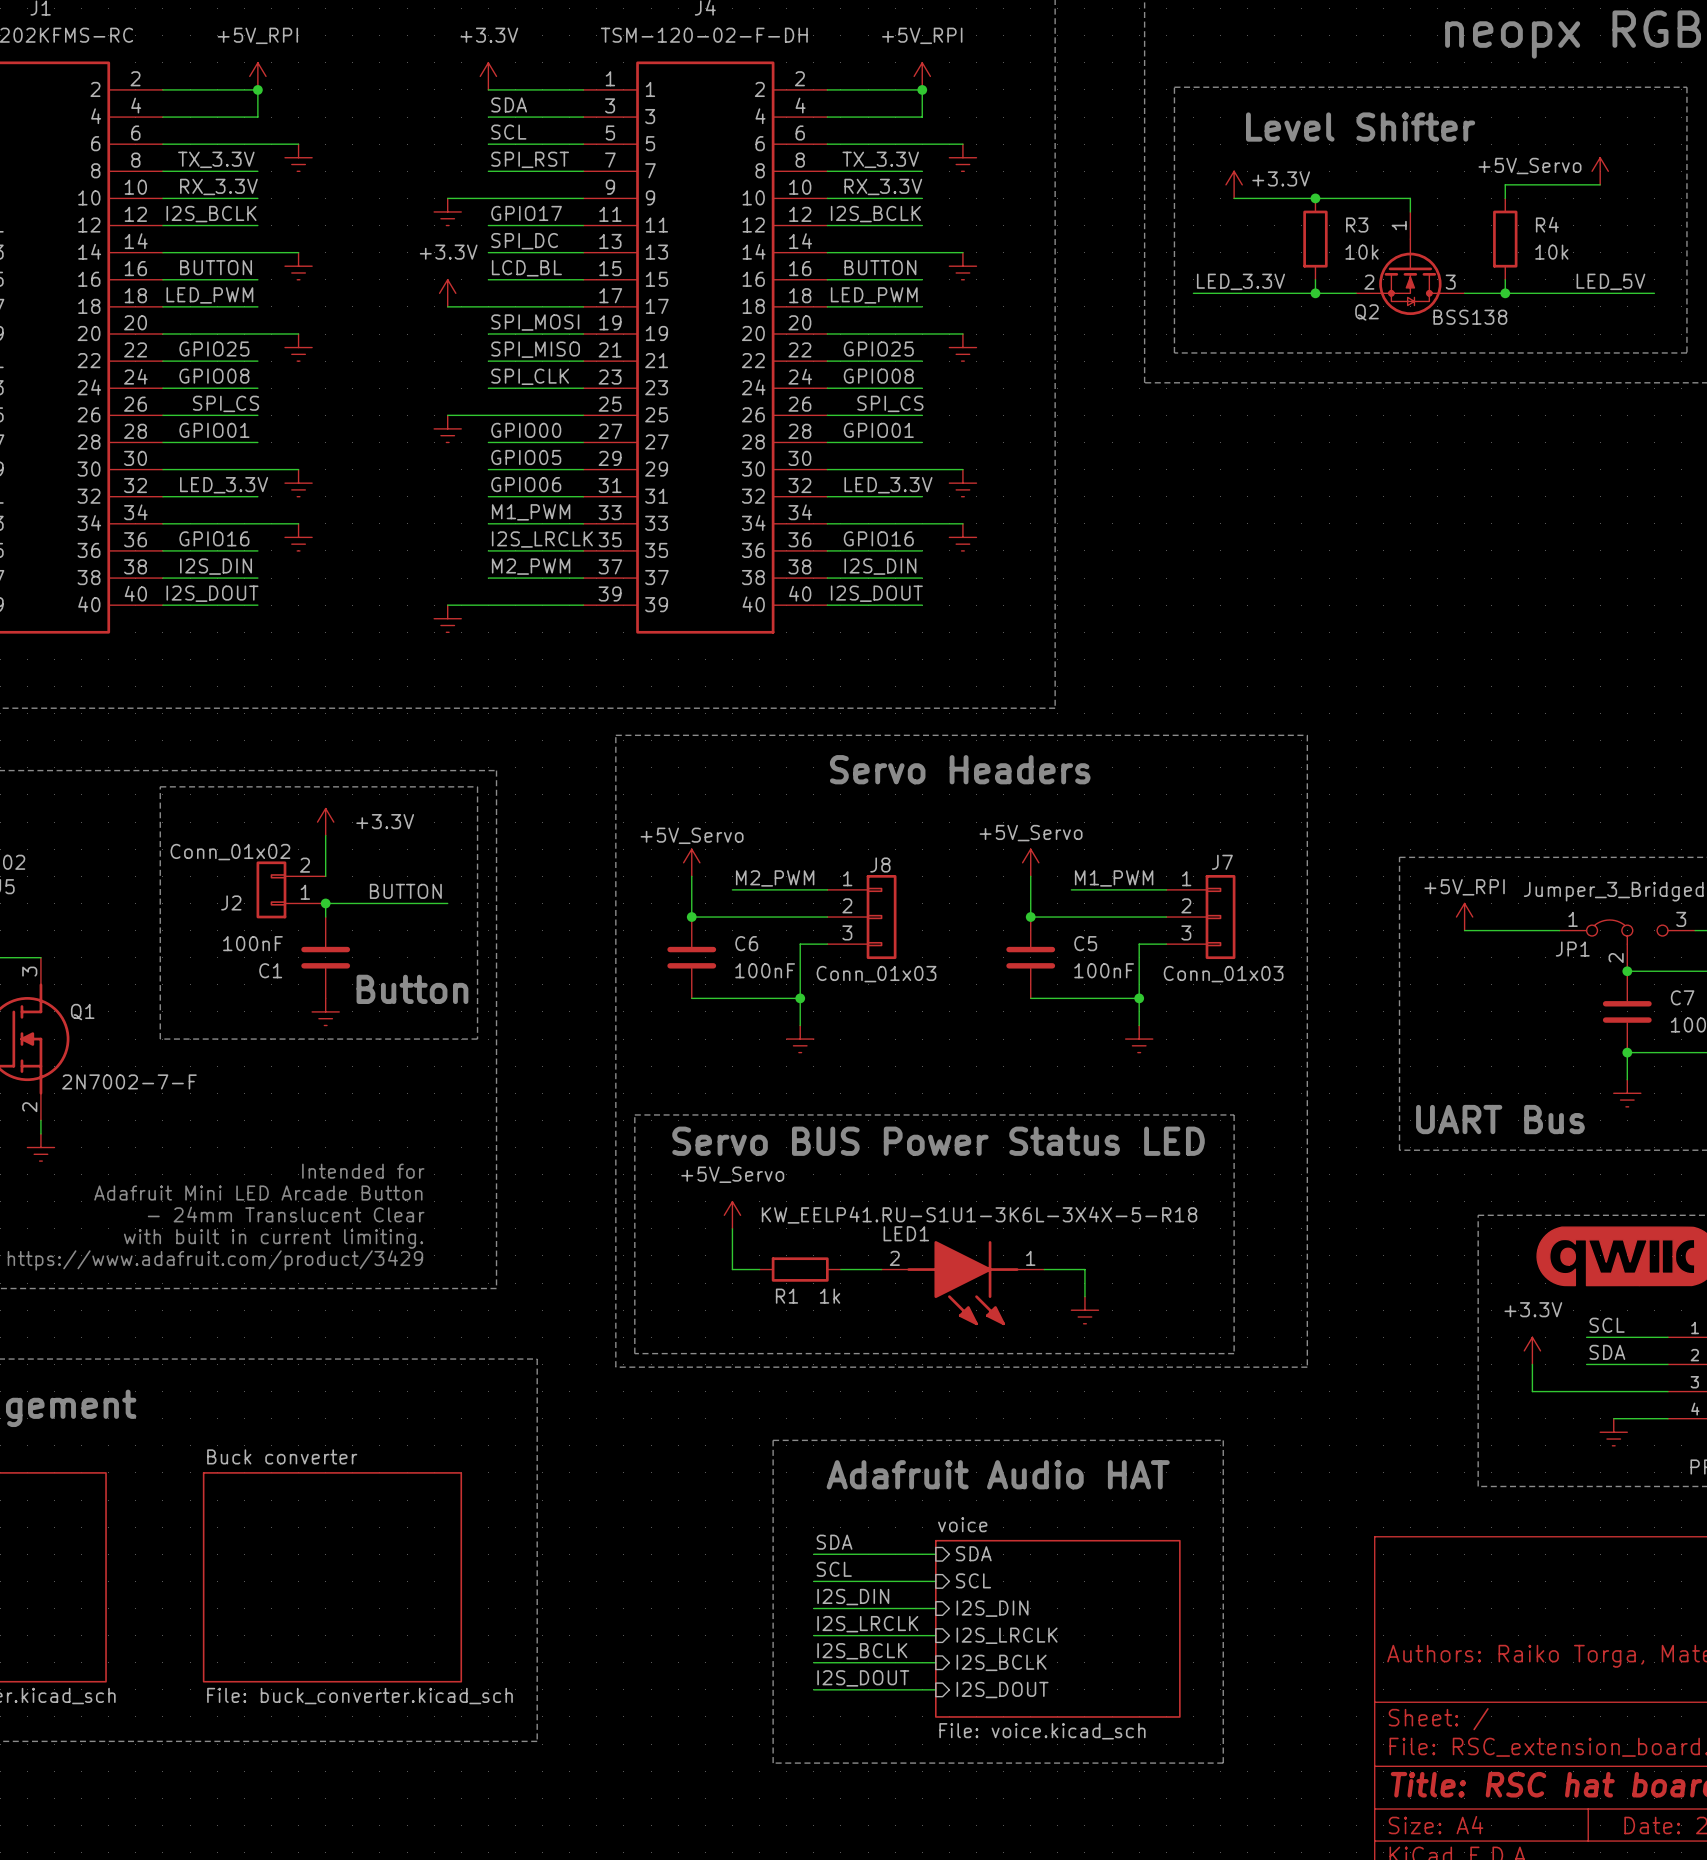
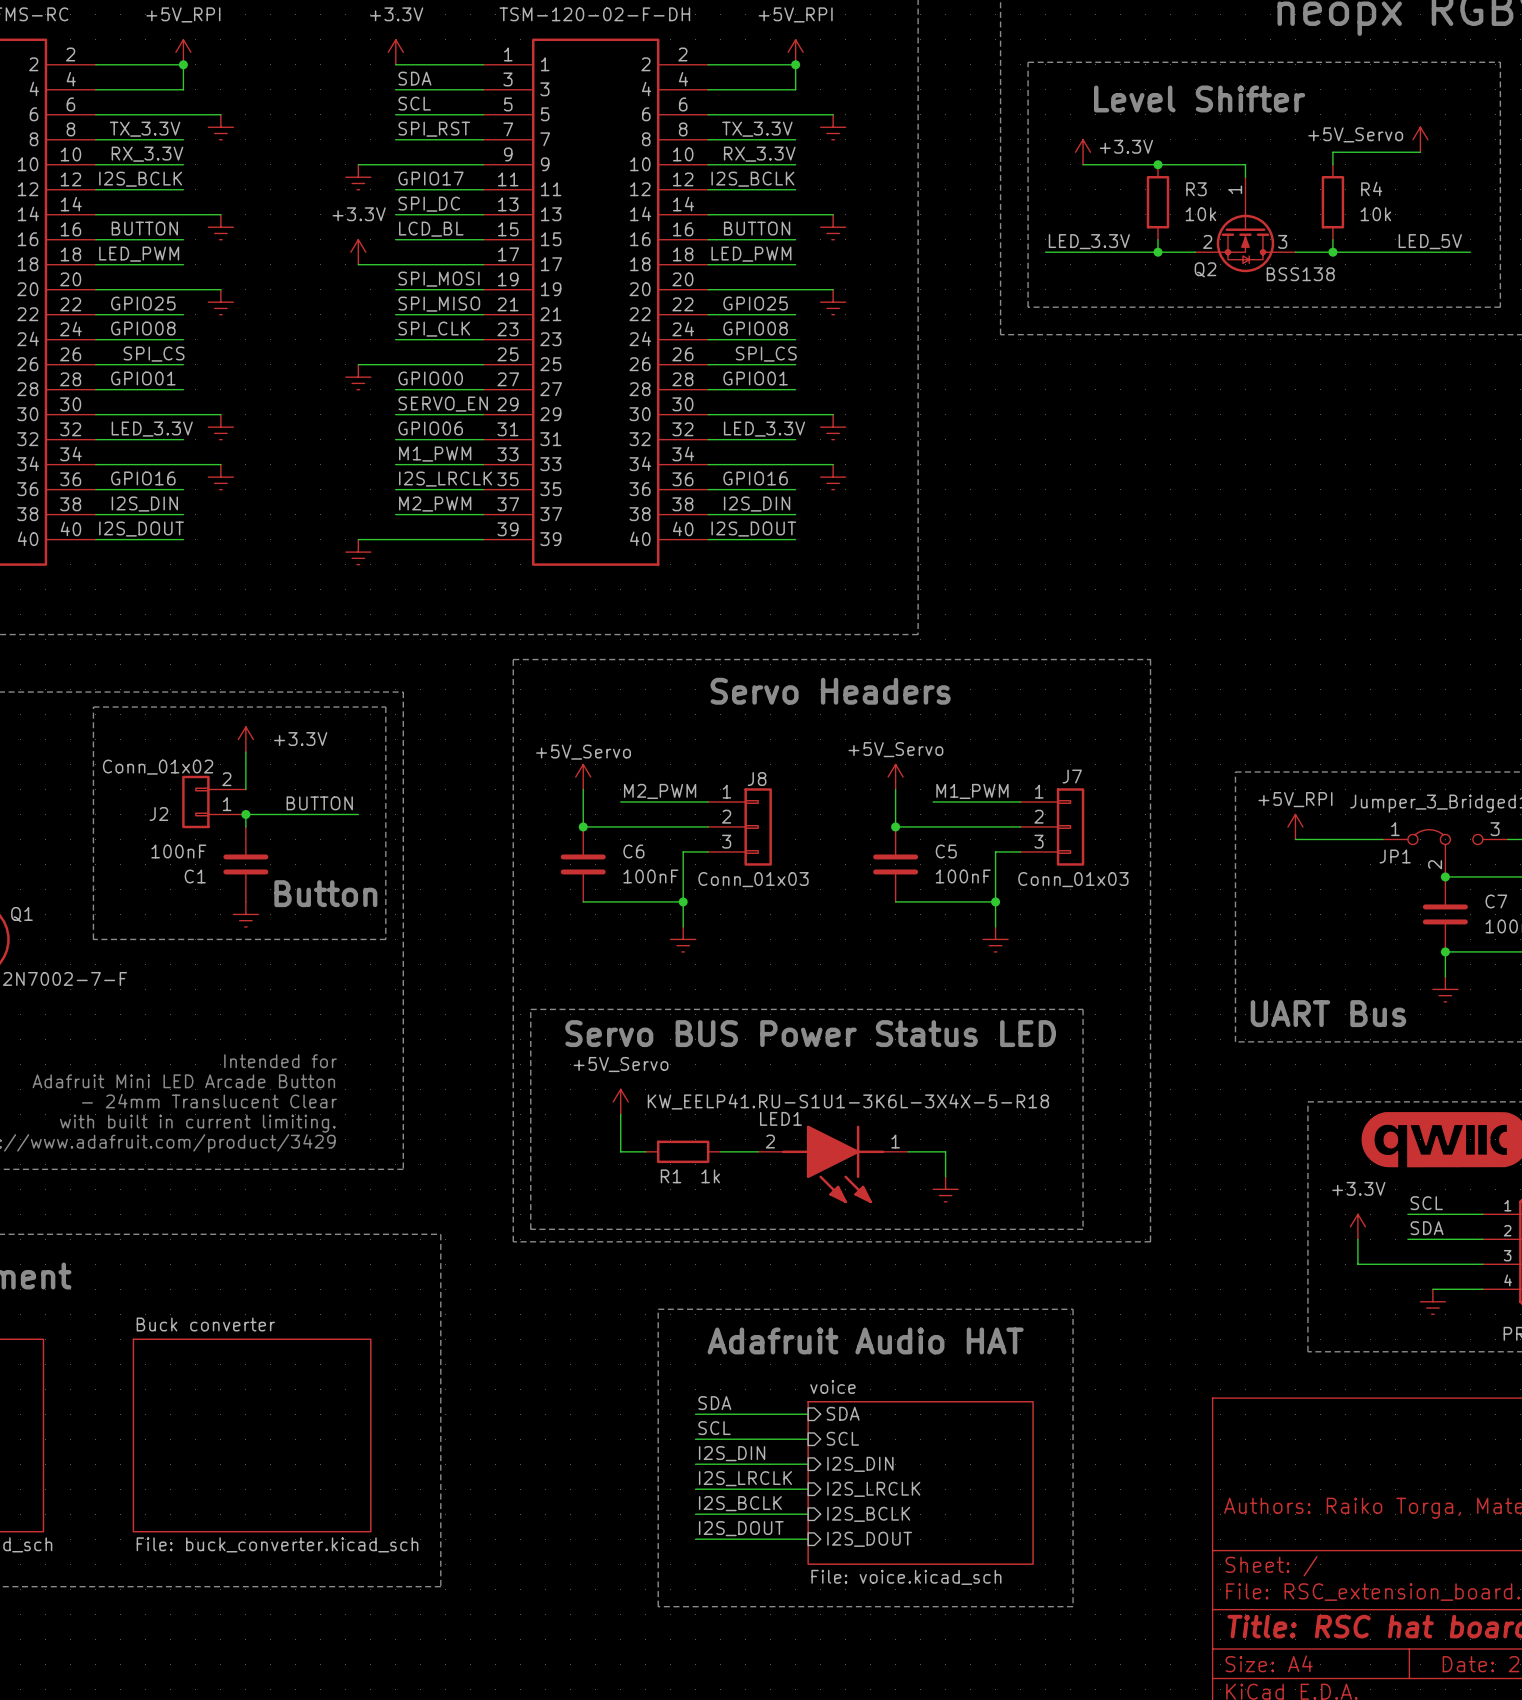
label: GPIO05 (526, 457) -> SERVO_EN (443, 404)

